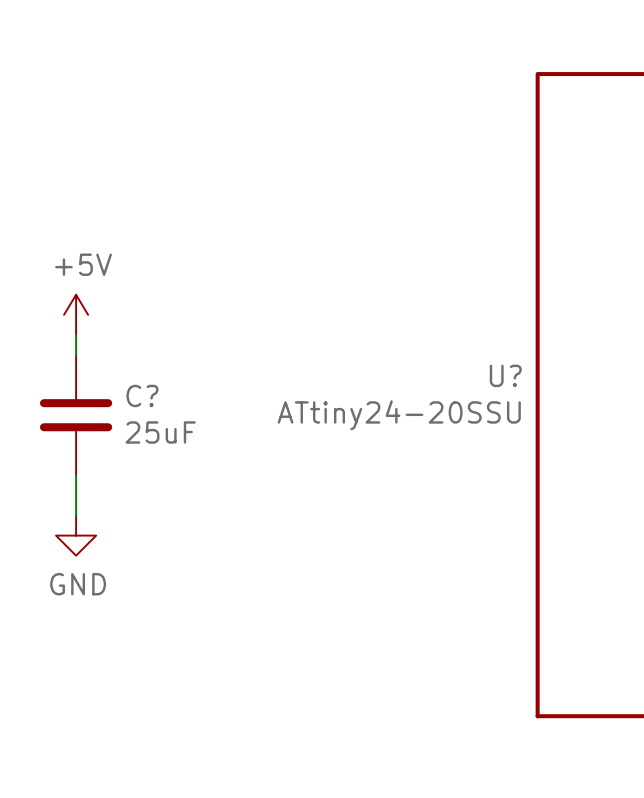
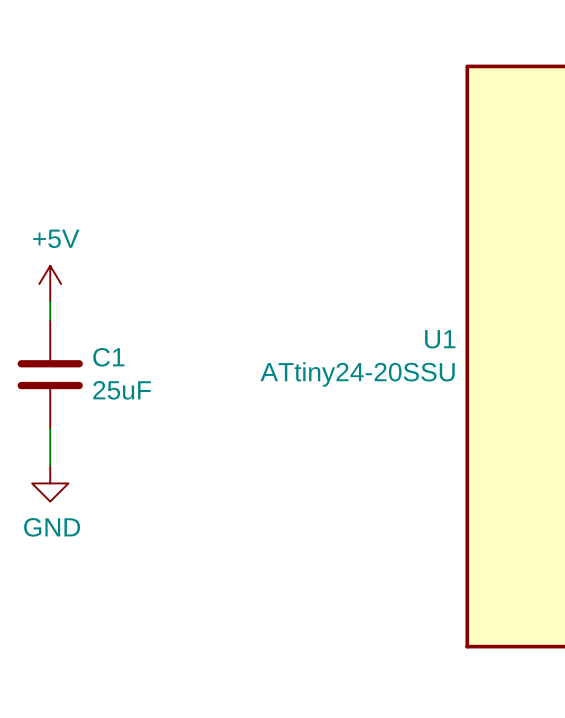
U? name: U? (505, 375) -> U1 (440, 339)
C? name: C? (142, 395) -> C1 (108, 357)

